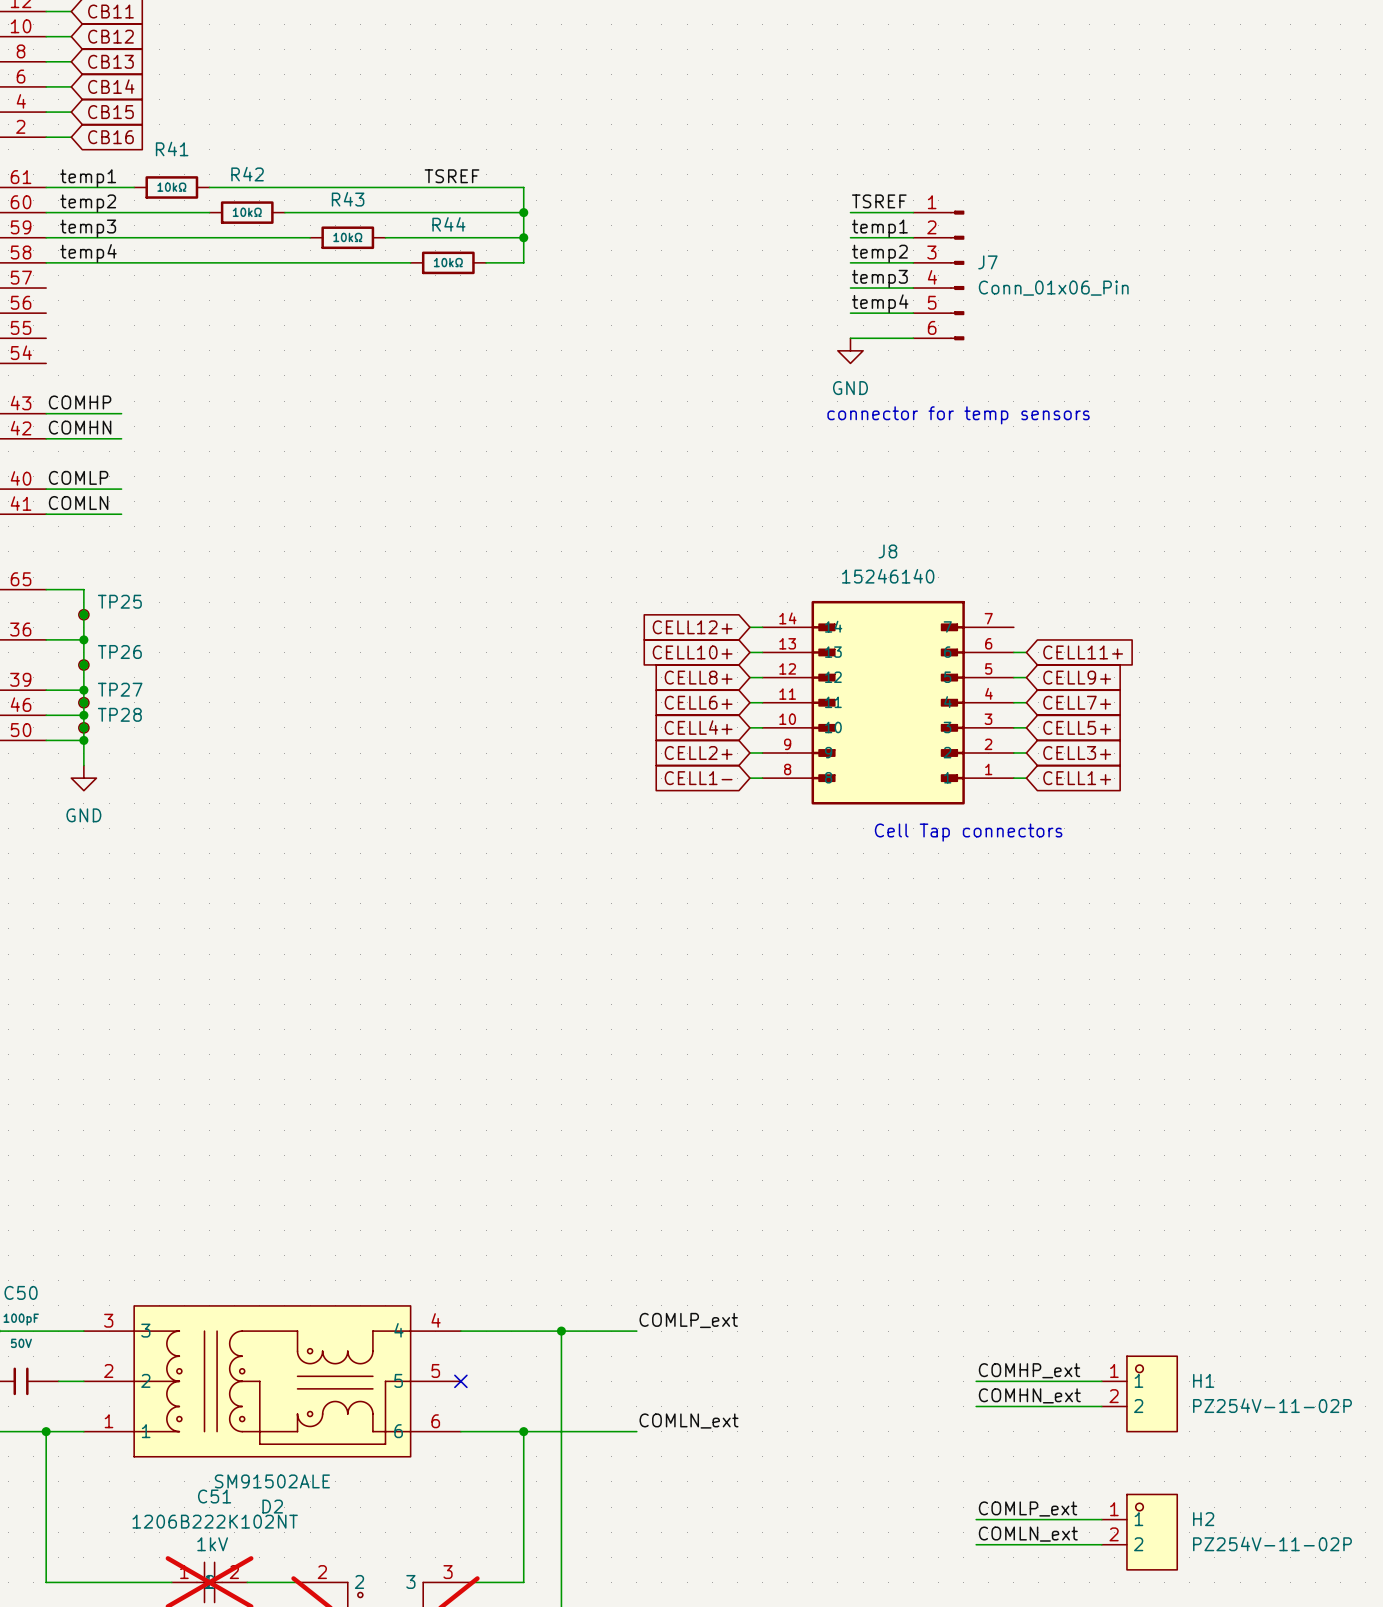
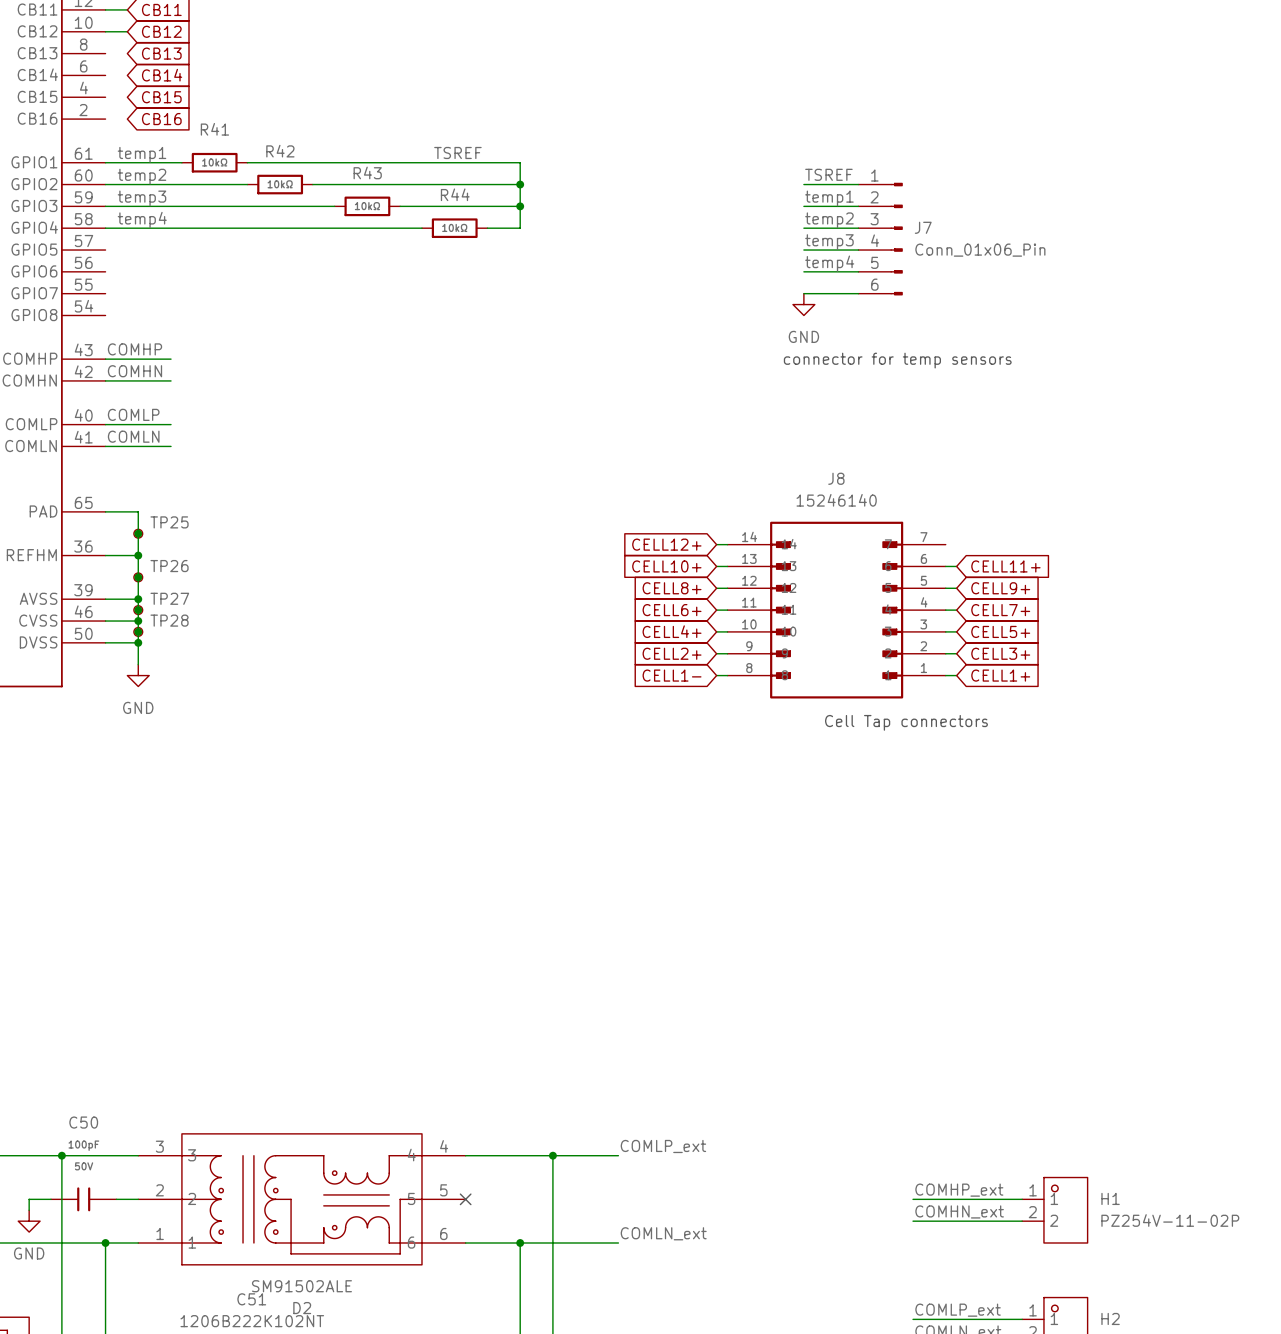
wire: (46, 61) (71, 61) -> none
wire: (46, 86) (71, 86) -> none
wire: (46, 112) (71, 112) -> none
wire: (46, 137) (71, 137) -> none

